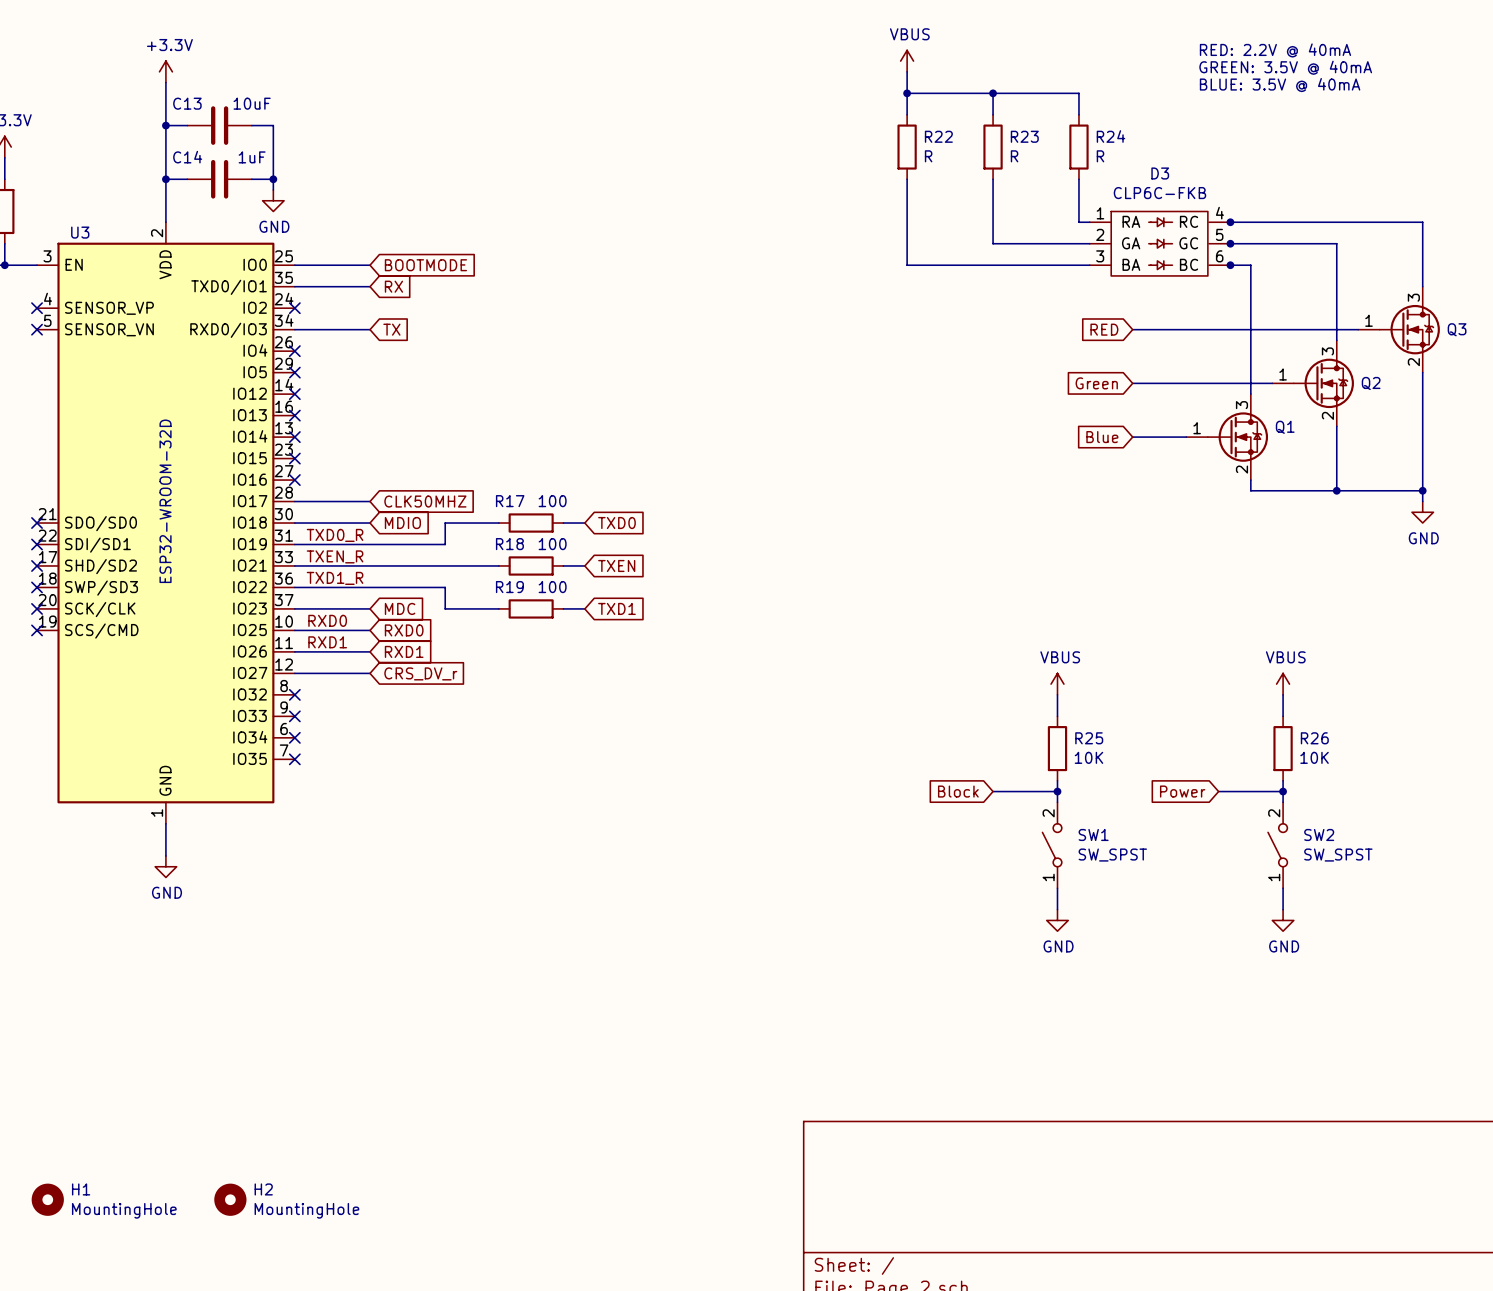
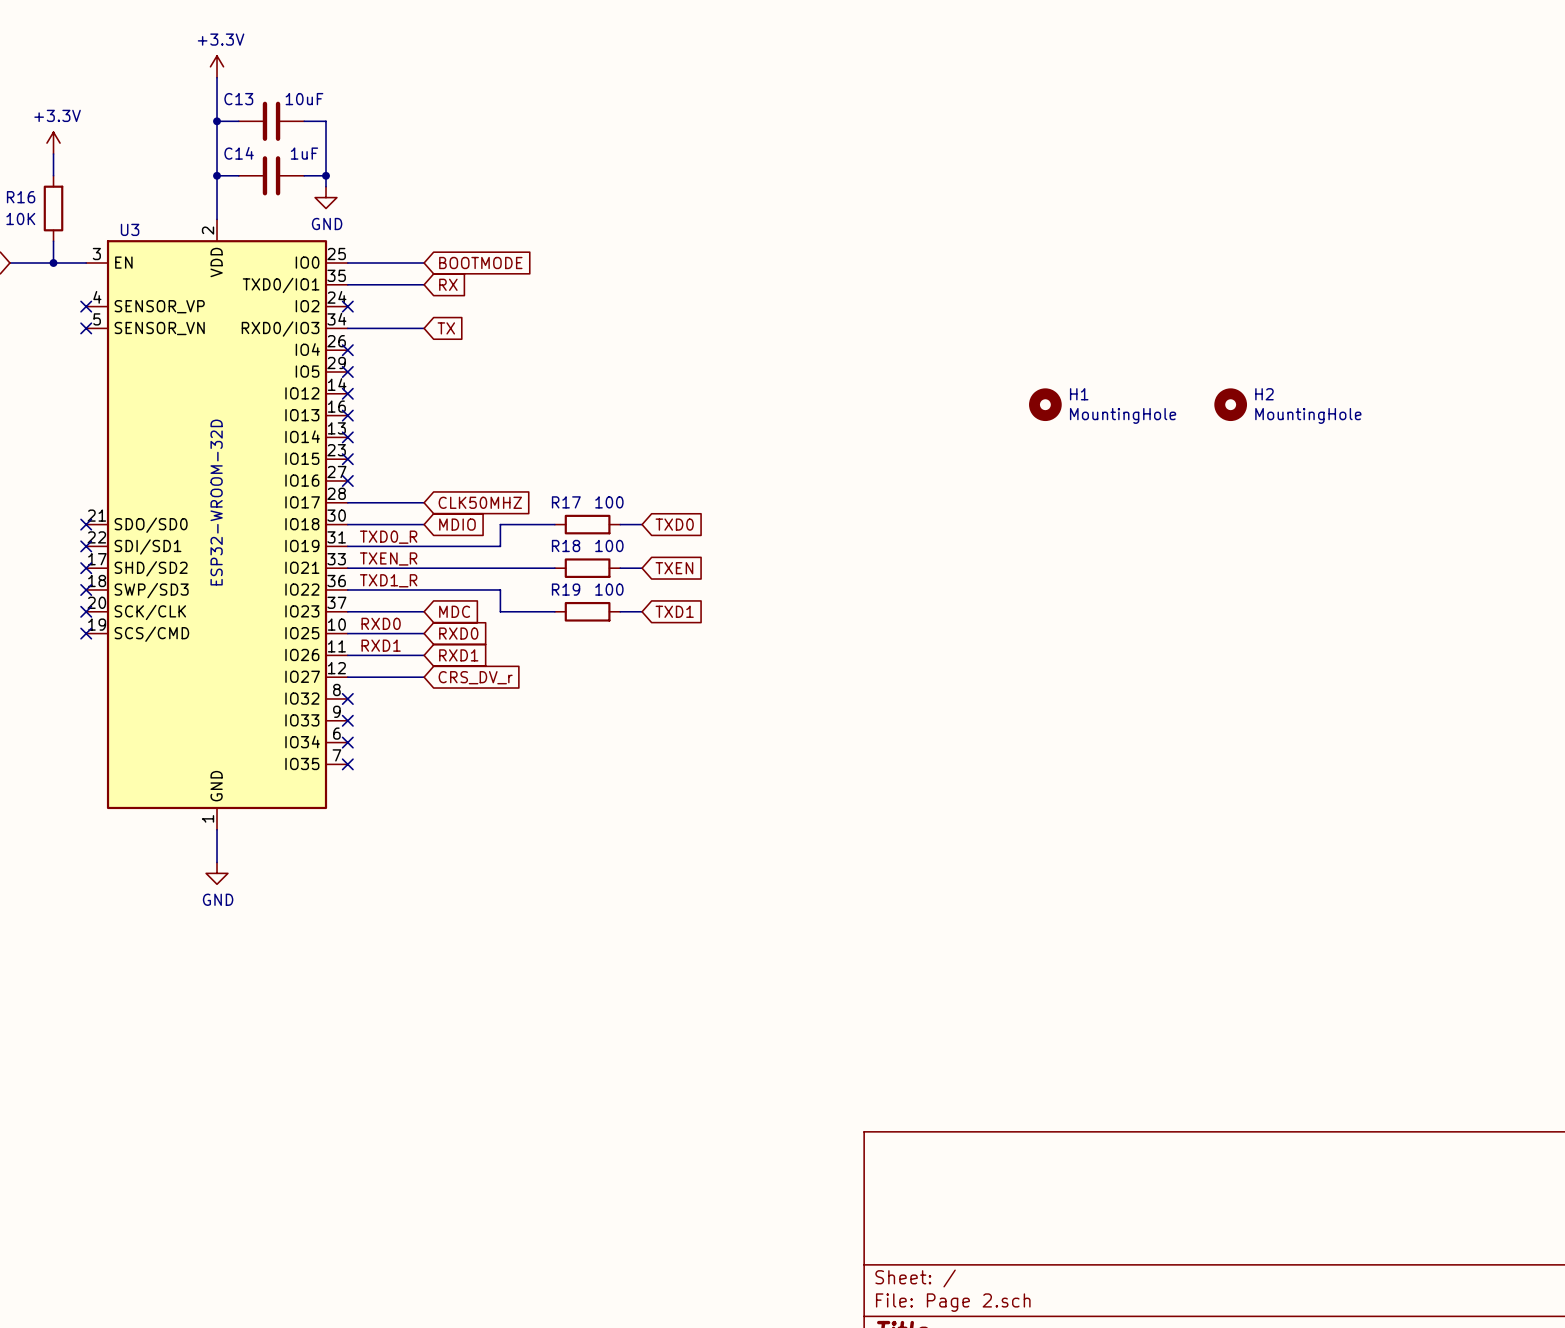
text: RED: 2.2V @ 40mA (1275, 50) -> none
power symbol: VBUS (907, 61) -> none
text: GREEN: 3.5V @ 40mA (1285, 67) -> none
wire: (907, 71) (907, 114) -> none
text: BLUE: 3.5V @ 40mA (1280, 85) -> none
wire: (907, 93) (1078, 93) (1078, 114) -> none
junction: (907, 93) -> none
wire: (993, 93) (993, 114) -> none
junction: (993, 93) -> none
R22: R (907, 147) -> none
R23: R (993, 147) -> none
R24: R (1078, 147) -> none
wire: (907, 179) (907, 265) (1089, 265) -> none
wire: (993, 179) (993, 243) (1089, 243) -> none
wire: (1078, 179) (1078, 222) (1089, 222) -> none
wire: (1229, 222) (1422, 222) (1422, 286) -> none
junction: (1230, 222) -> none
D3: CLP6C-FKB (1160, 243) -> none
wire: (1229, 243) (1336, 243) (1336, 340) -> none
junction: (1230, 243) -> none
wire: (1229, 265) (1250, 265) (1250, 394) -> none
junction: (1230, 265) -> none
global label: RED (1104, 329) -> none
wire: (1132, 329) (1358, 329) -> none
Q3: (1399, 329) -> none
wire: (1422, 372) (1422, 501) -> none
global label: Green (1096, 383) -> none
wire: (1132, 383) (1272, 383) -> none
Q2: (1313, 383) -> none
wire: (1336, 426) (1336, 490) -> none
global label: Blue (1102, 437) -> none
wire: (1132, 437) (1186, 437) -> none
Q1: (1227, 437) -> none
wire: (1250, 480) (1250, 490) (1422, 490) -> none
junction: (1336, 490) -> none
junction: (1422, 490) -> none
power symbol: GND (1422, 512) -> none
power symbol: VBUS (1057, 684) -> none
power symbol: VBUS (1283, 684) -> none
wire: (1057, 694) (1057, 716) -> none
wire: (1283, 694) (1283, 716) -> none
R25: 10K (1057, 748) -> none
R26: 10K (1283, 748) -> none
wire: (1057, 780) (1057, 802) -> none
wire: (1283, 780) (1283, 802) -> none
global label: Block (958, 791) -> none
wire: (993, 791) (1057, 791) -> none
junction: (1057, 791) -> none
global label: Power (1182, 791) -> none
wire: (1218, 791) (1283, 791) -> none
junction: (1283, 791) -> none
SW1: SW_SPST (1052, 845) -> none
SW2: SW_SPST (1277, 845) -> none
wire: (1057, 888) (1057, 909) -> none
wire: (1283, 888) (1283, 909) -> none
power symbol: GND (1057, 920) -> none
power symbol: GND (1283, 920) -> none
H1 position: (47, 1199) -> (1045, 404)
H2 position: (230, 1199) -> (1230, 404)

